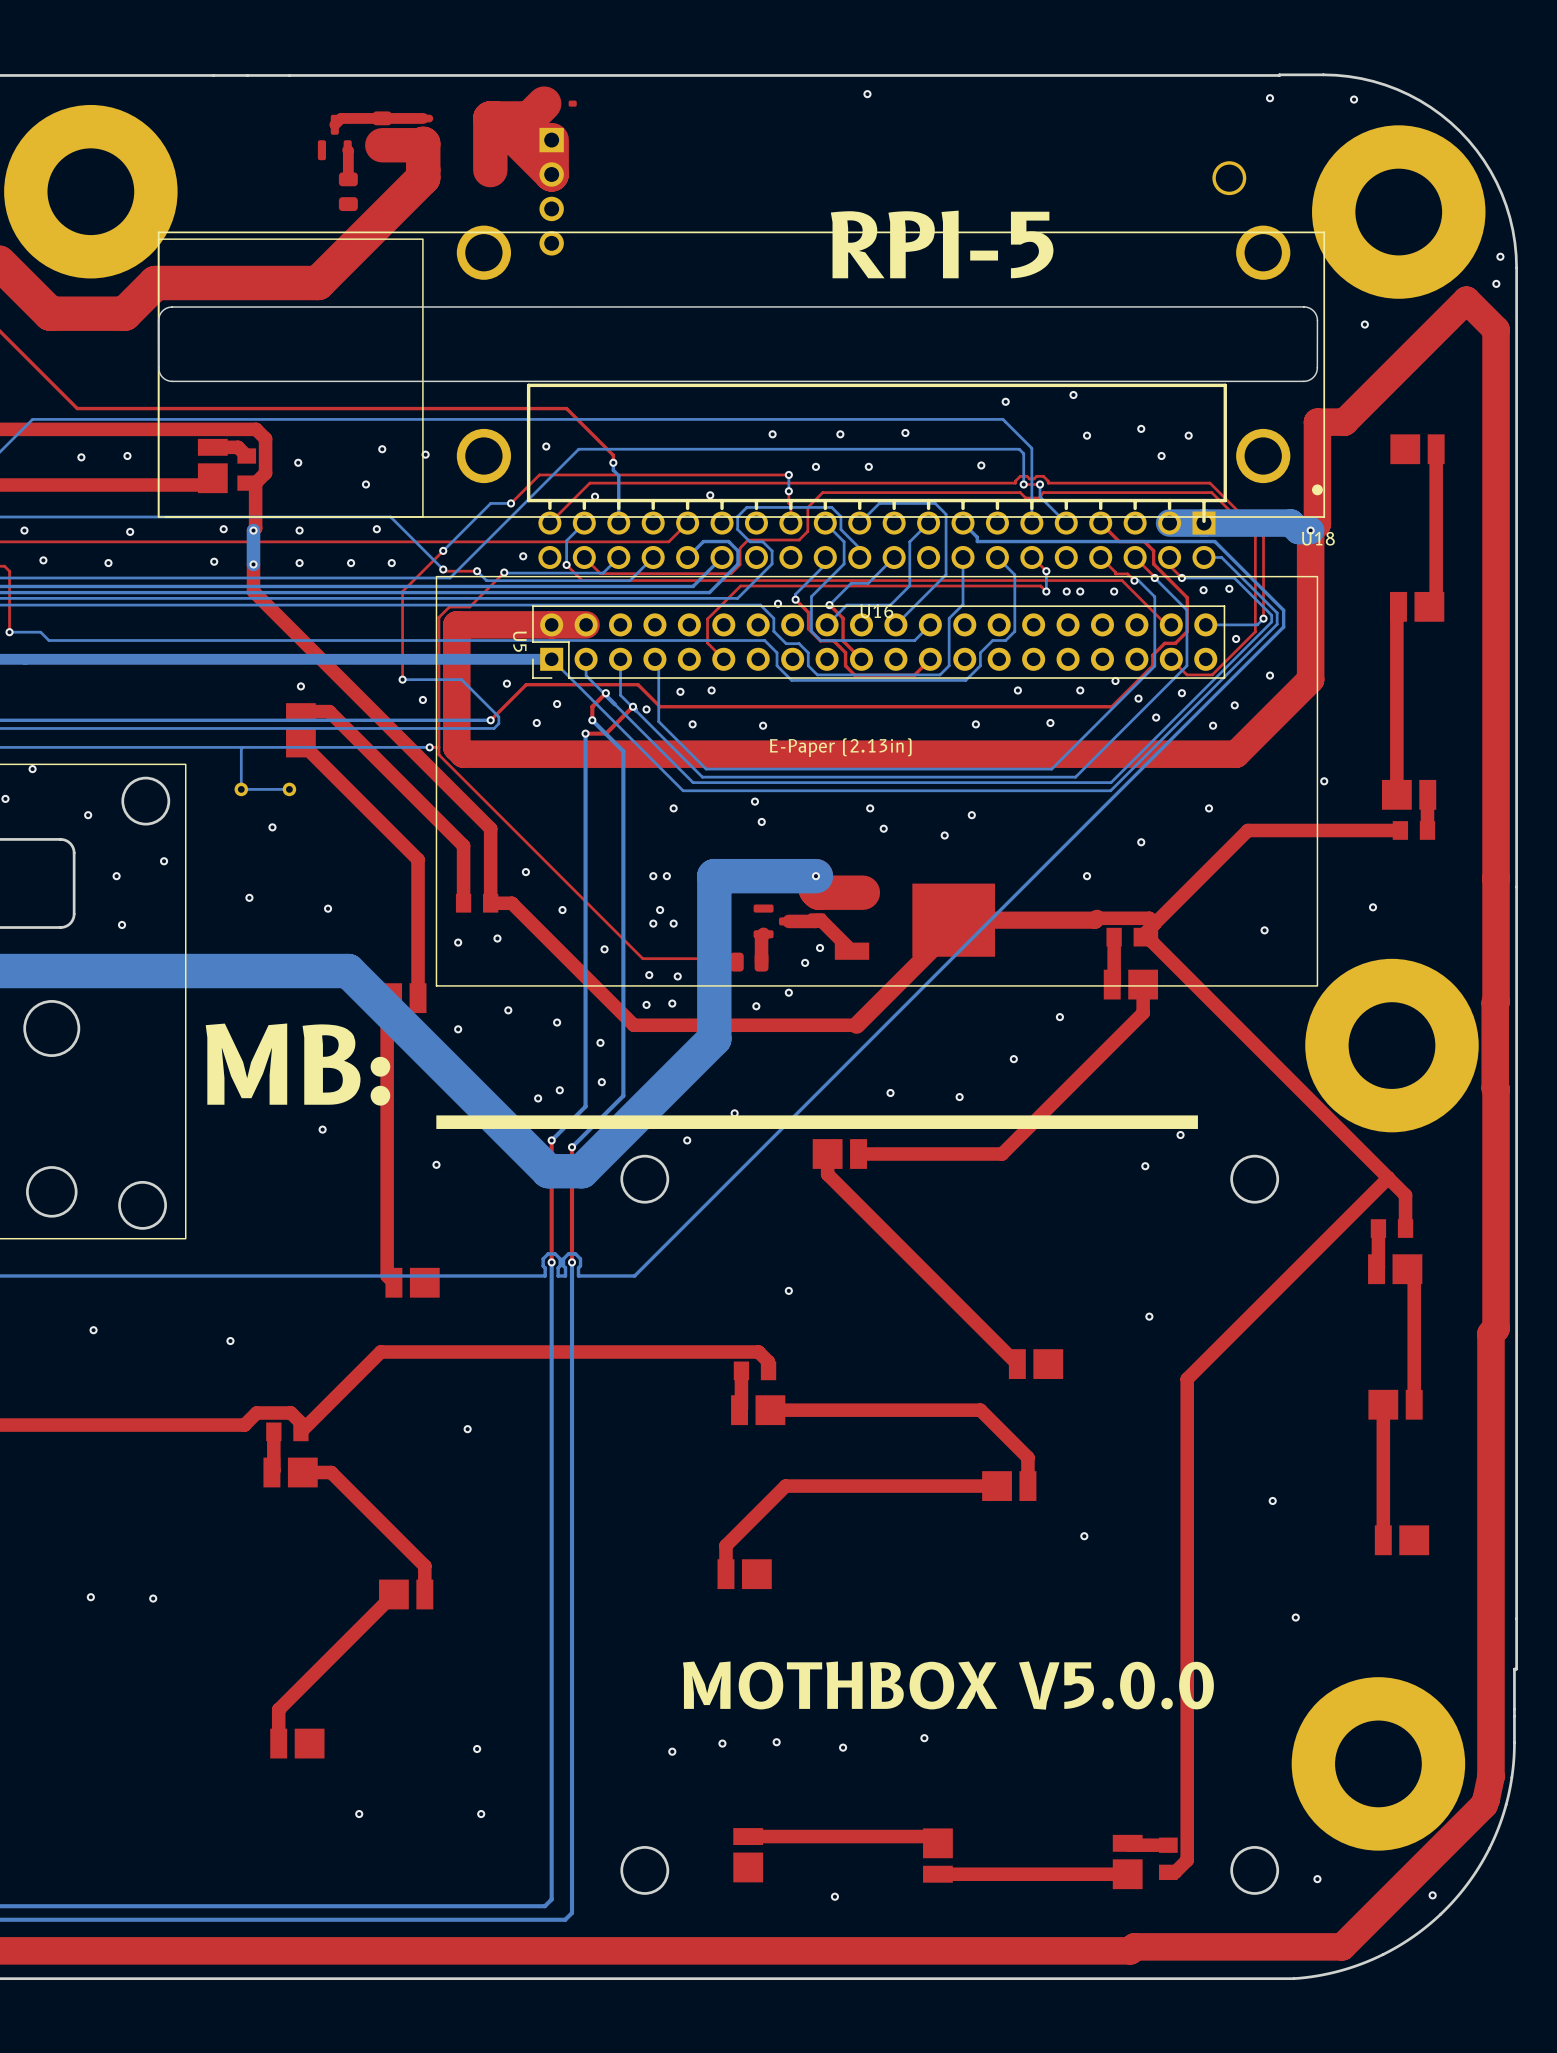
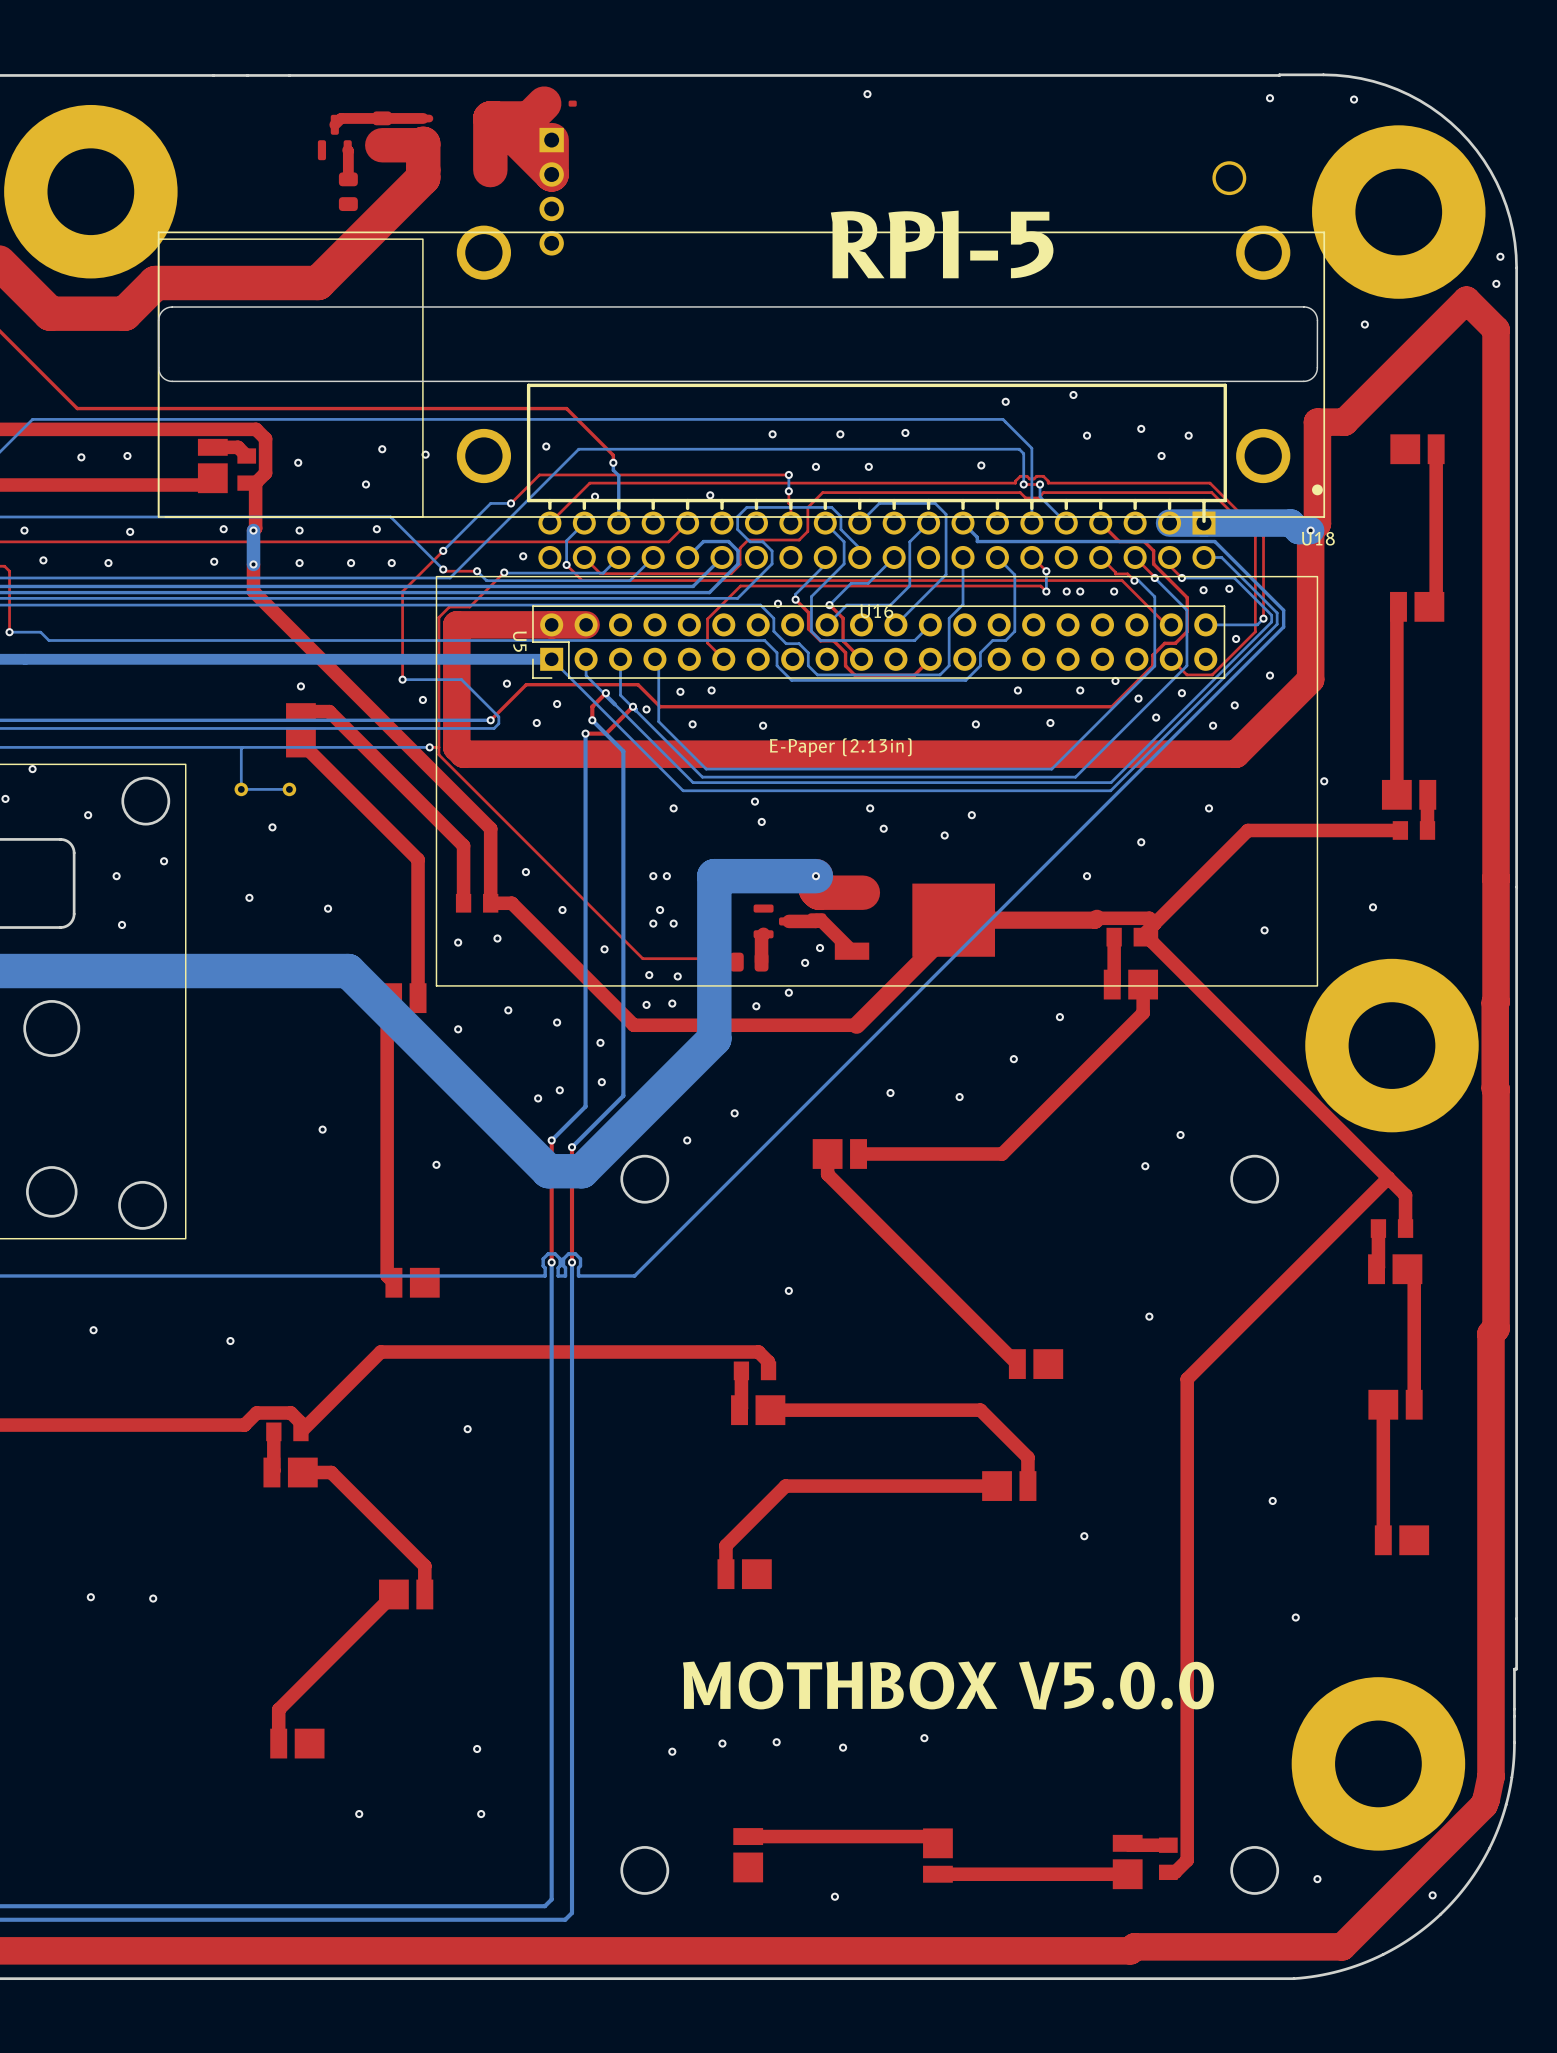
text: MB: _____________ (701, 1076) -> none

